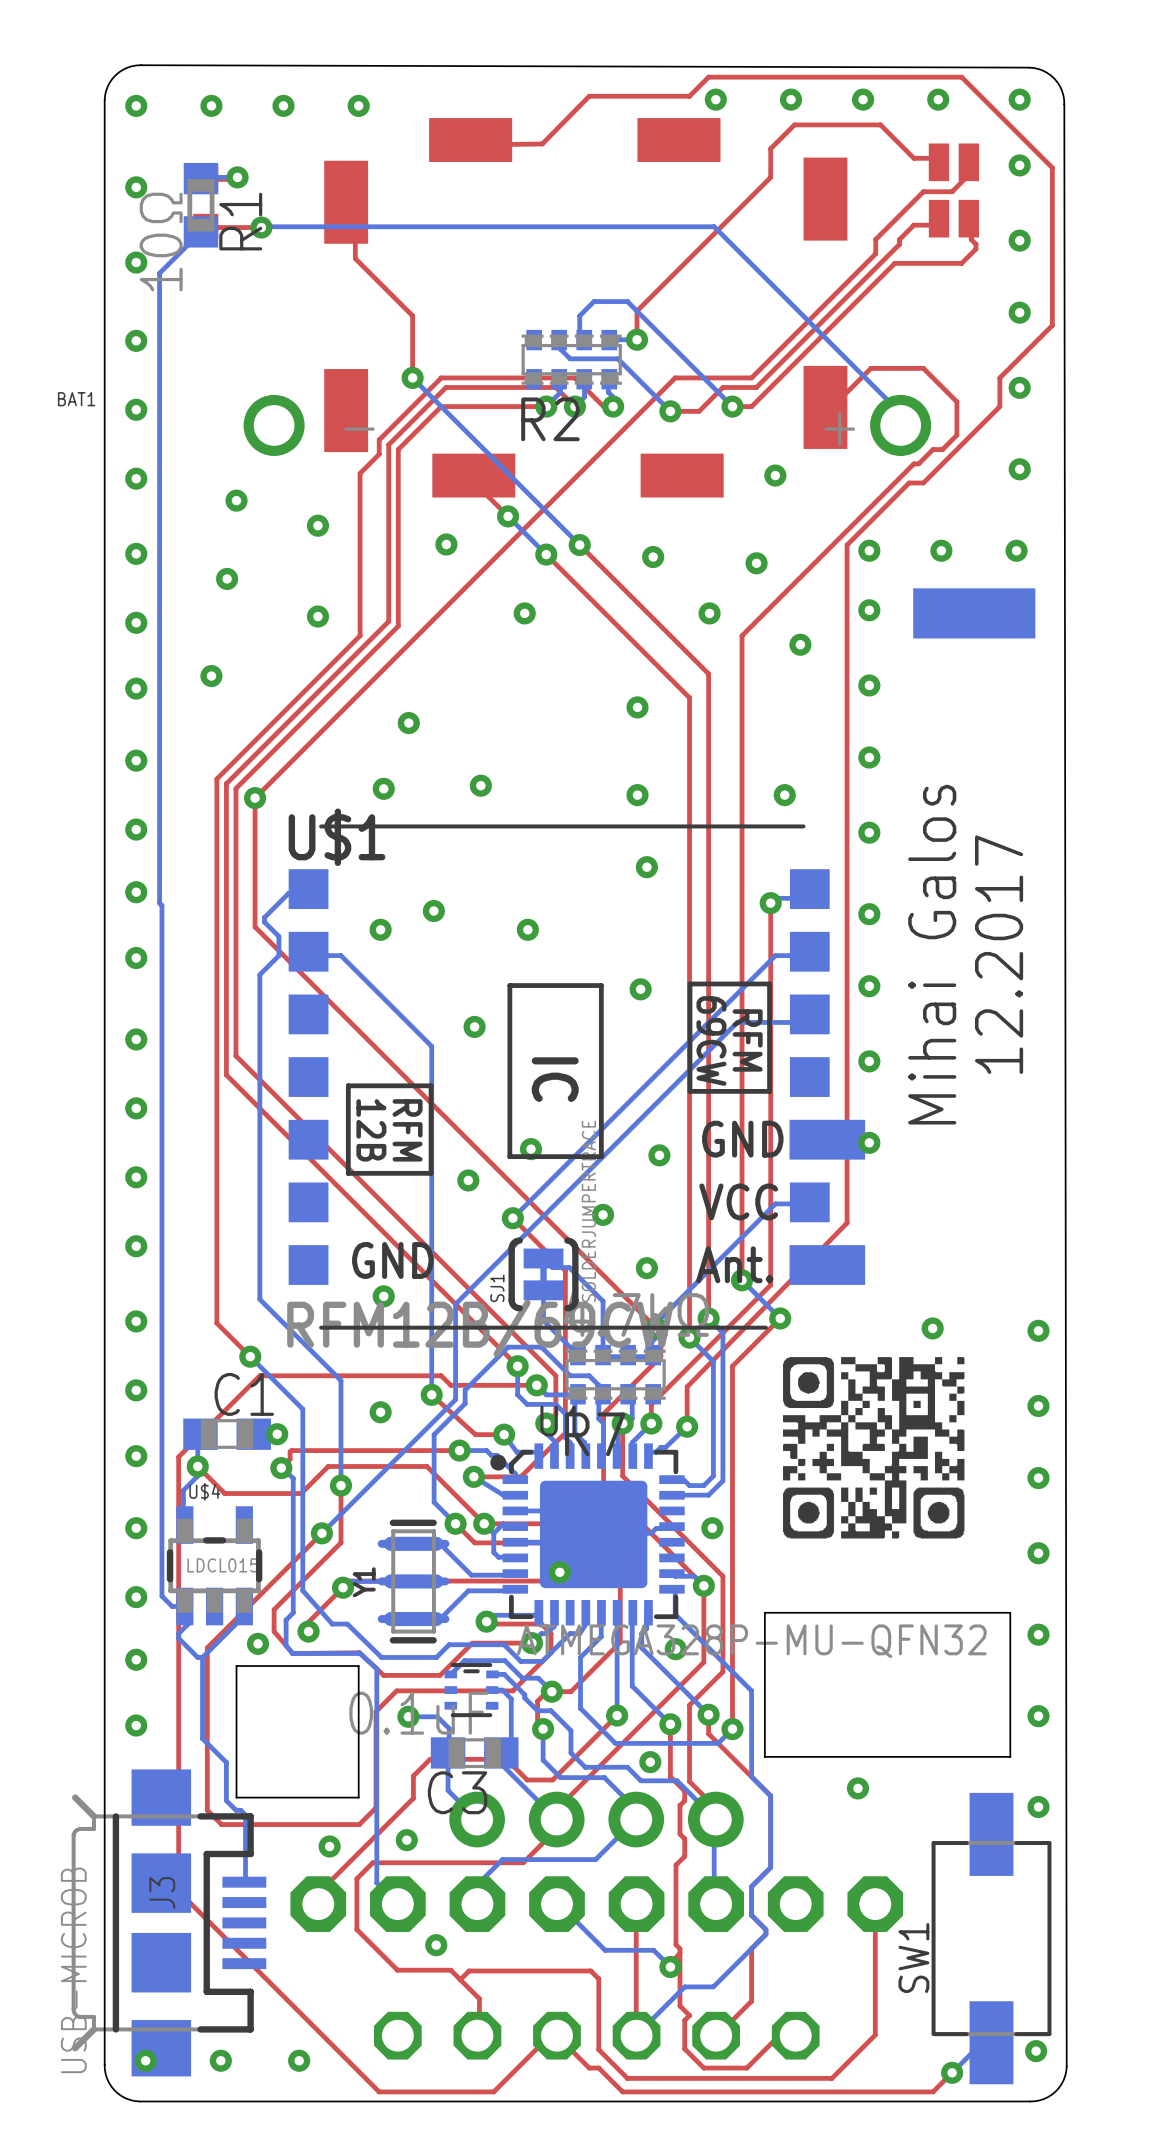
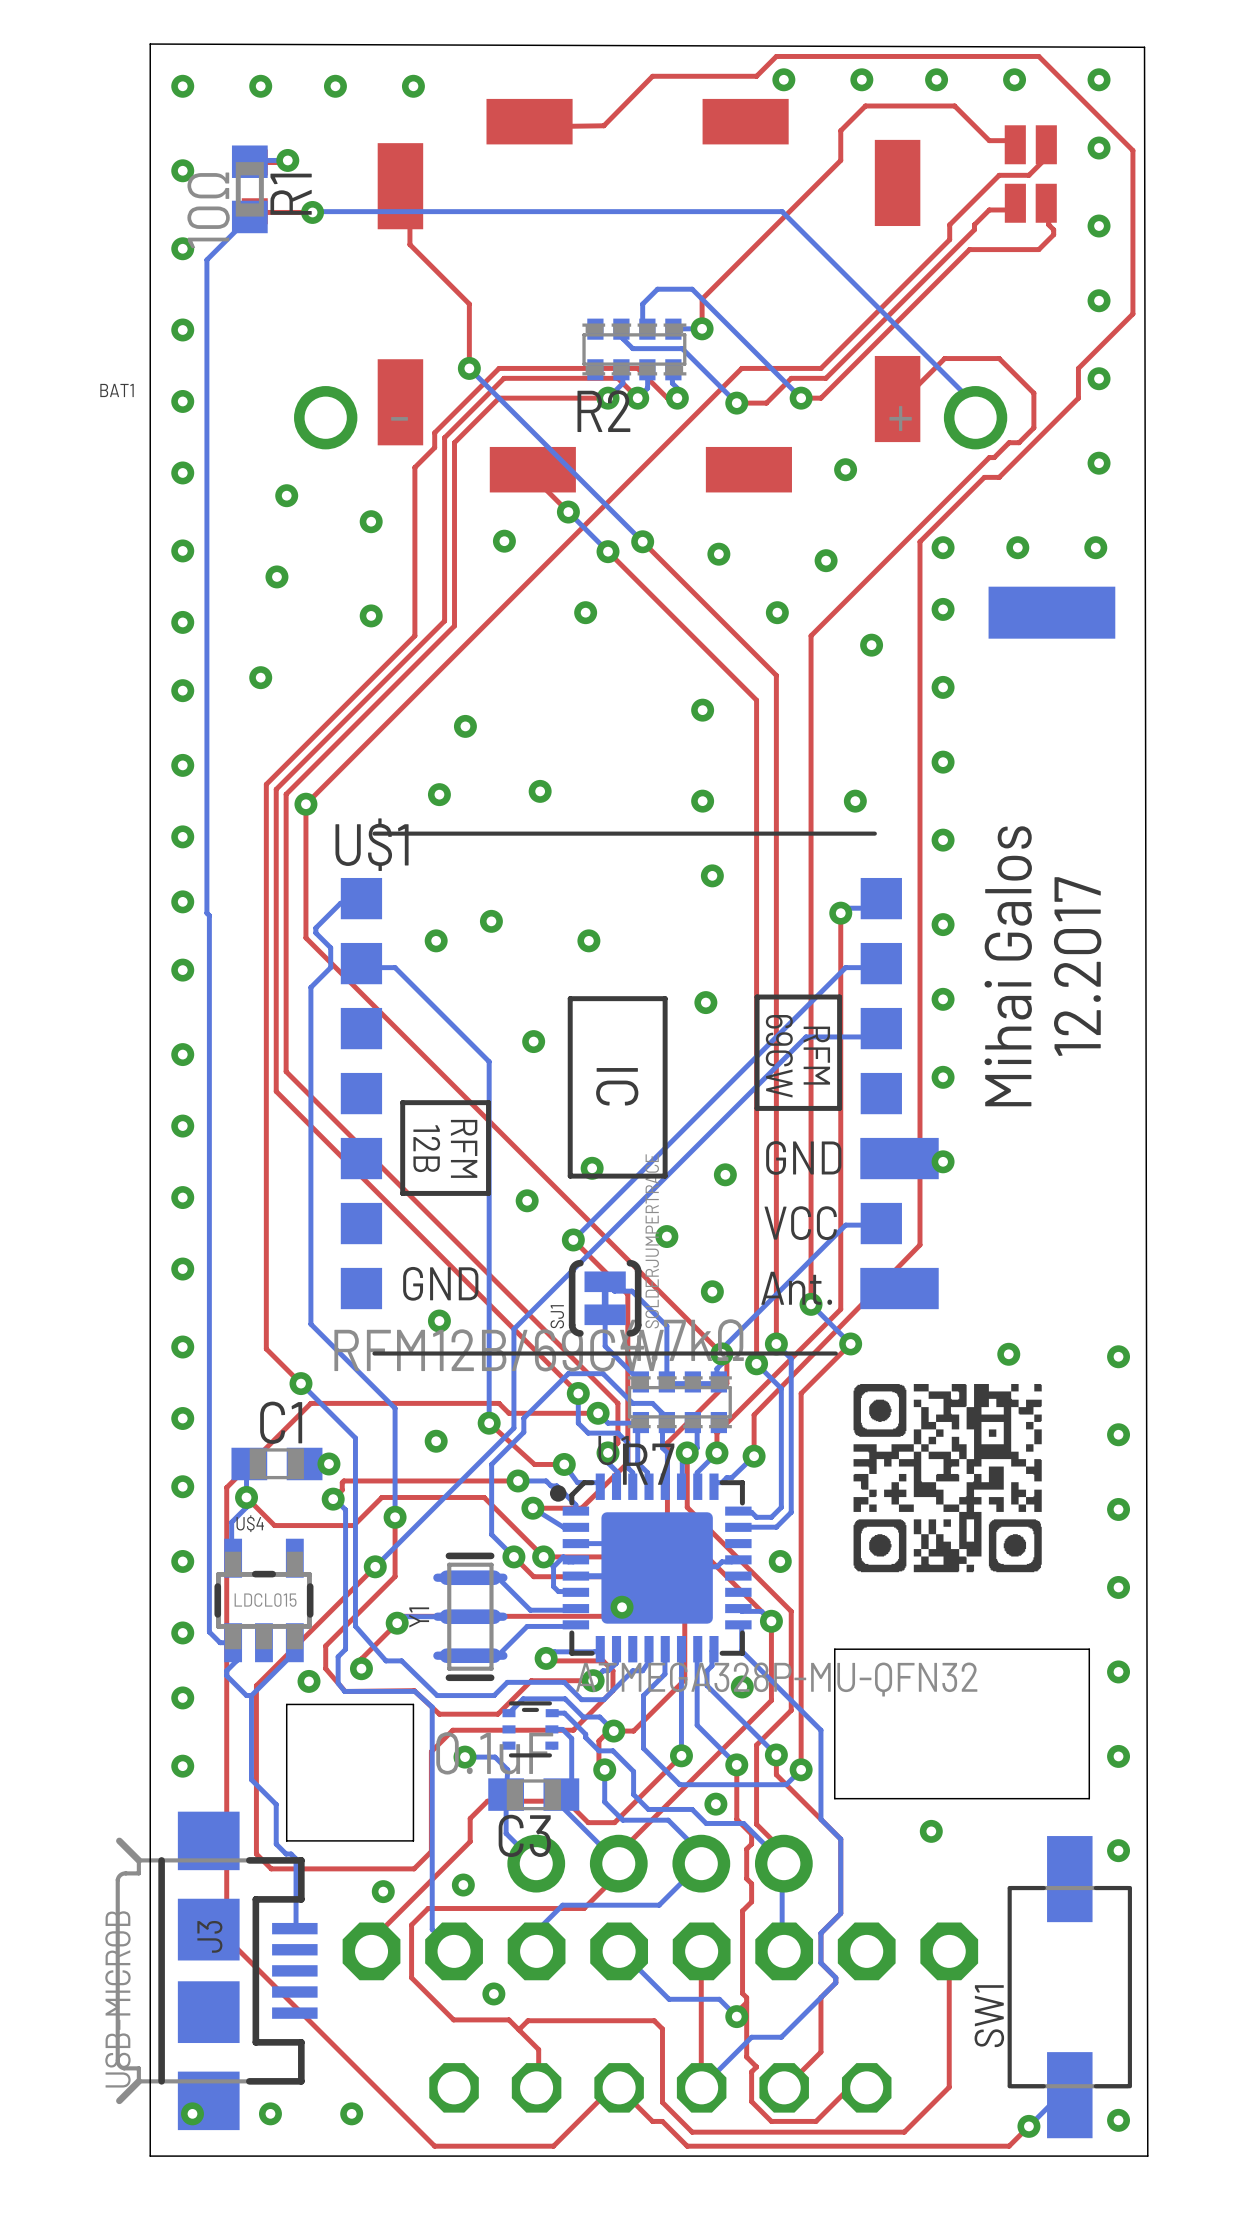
via position: (1036, 2051) -> (1118, 2120)
board edge: (1030, 2101) (1043, 2099) (1055, 2091) (1063, 2080) (1066, 2066) (1064, 104) (1061, 90) (1057, 82) (1047, 72) (1029, 67) (141, 65) (127, 67) (115, 75) (107, 86) (104, 100) (104, 2064) (107, 2078) (114, 2090) (126, 2098) (139, 2101) -> (1109, 2156) (1147, 2156) (1144, 47) (150, 44) (150, 2156) (186, 2156)

